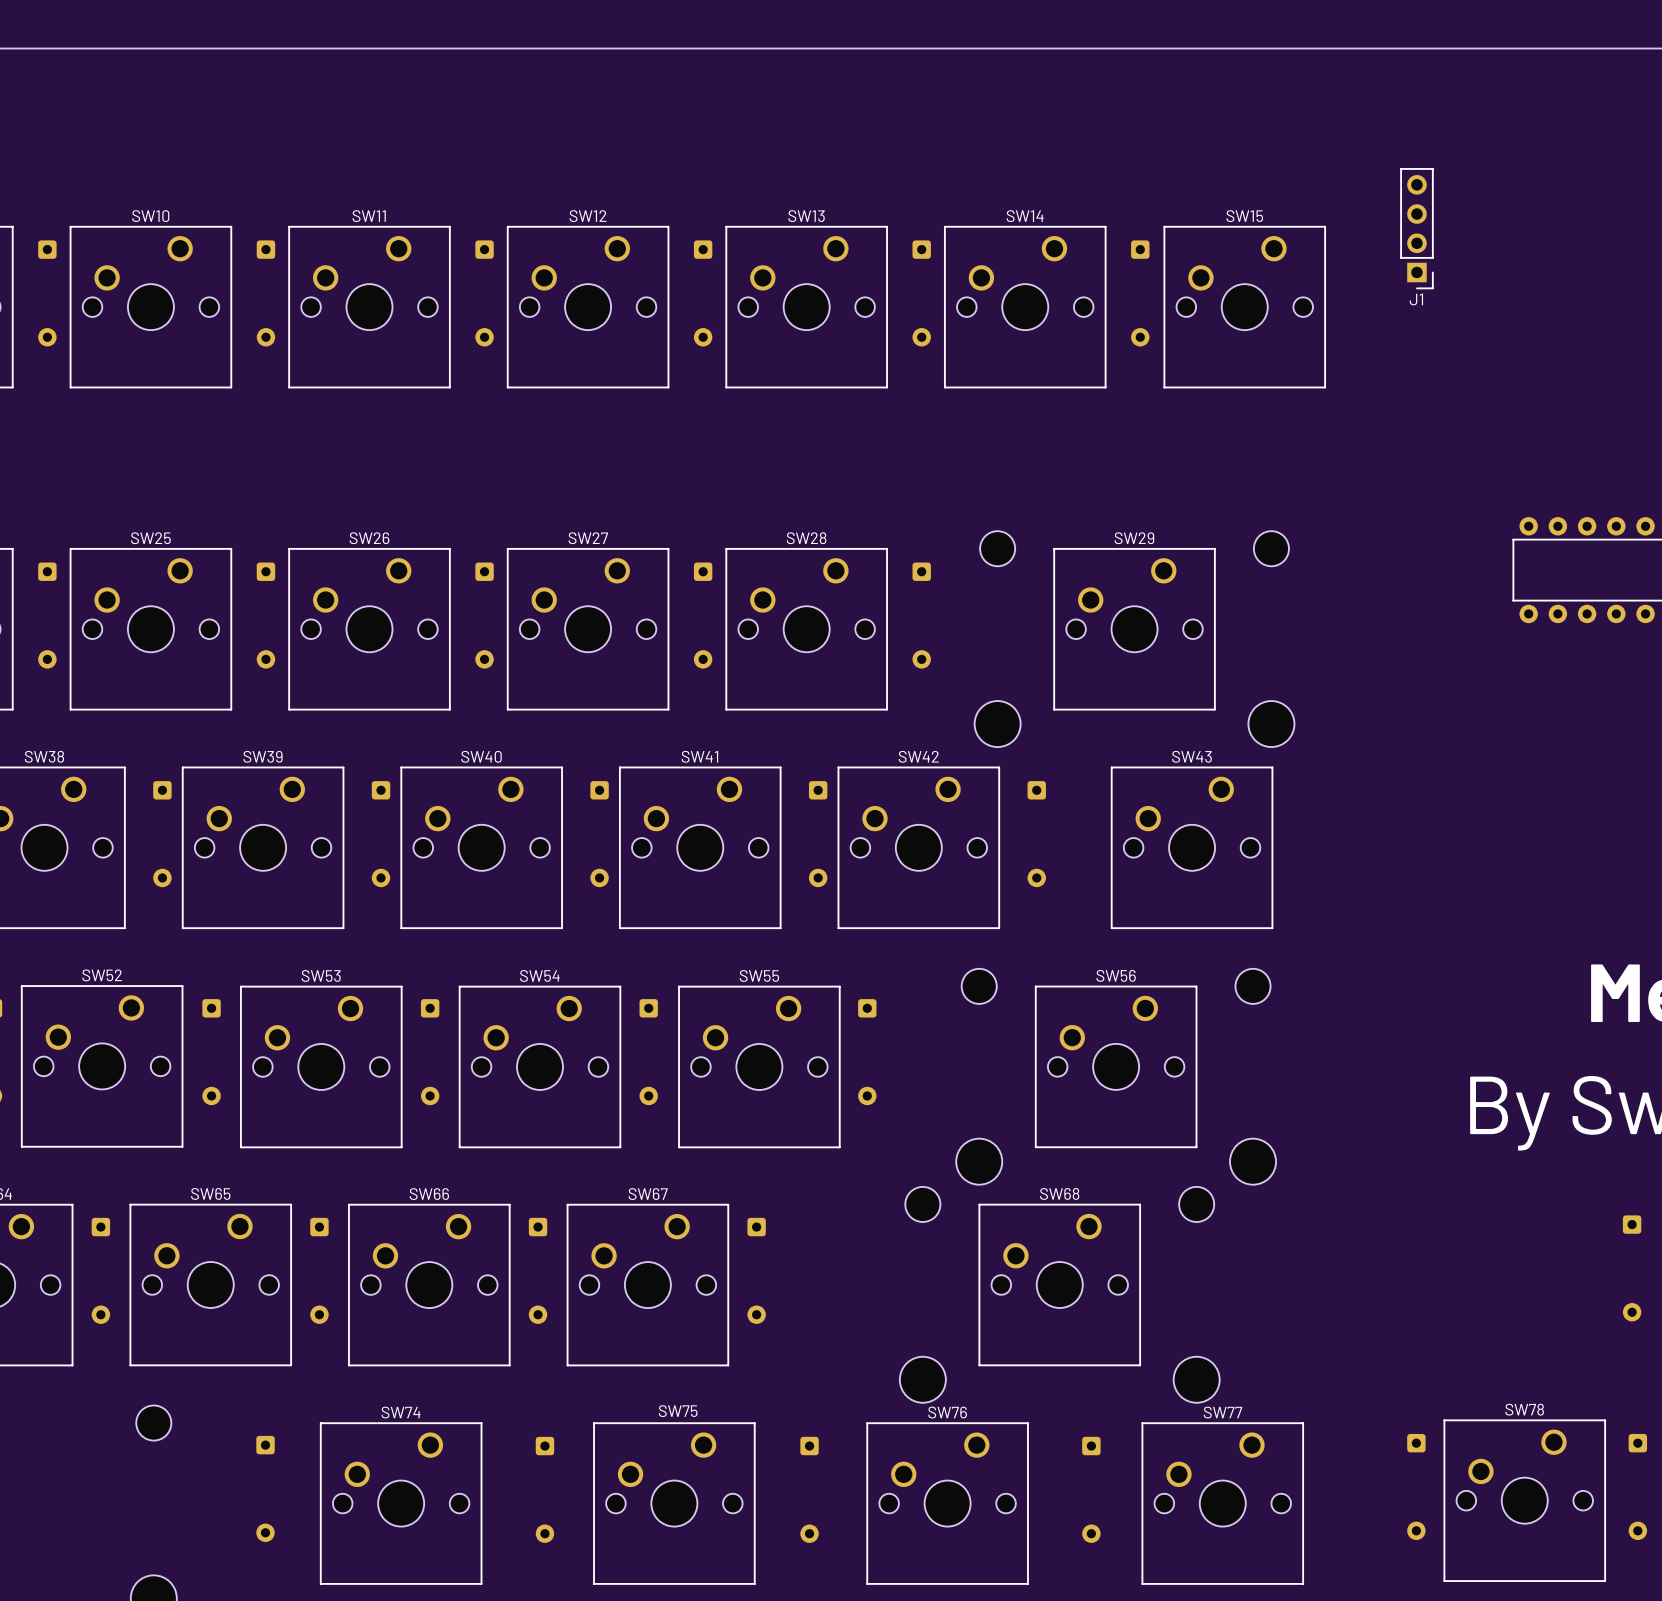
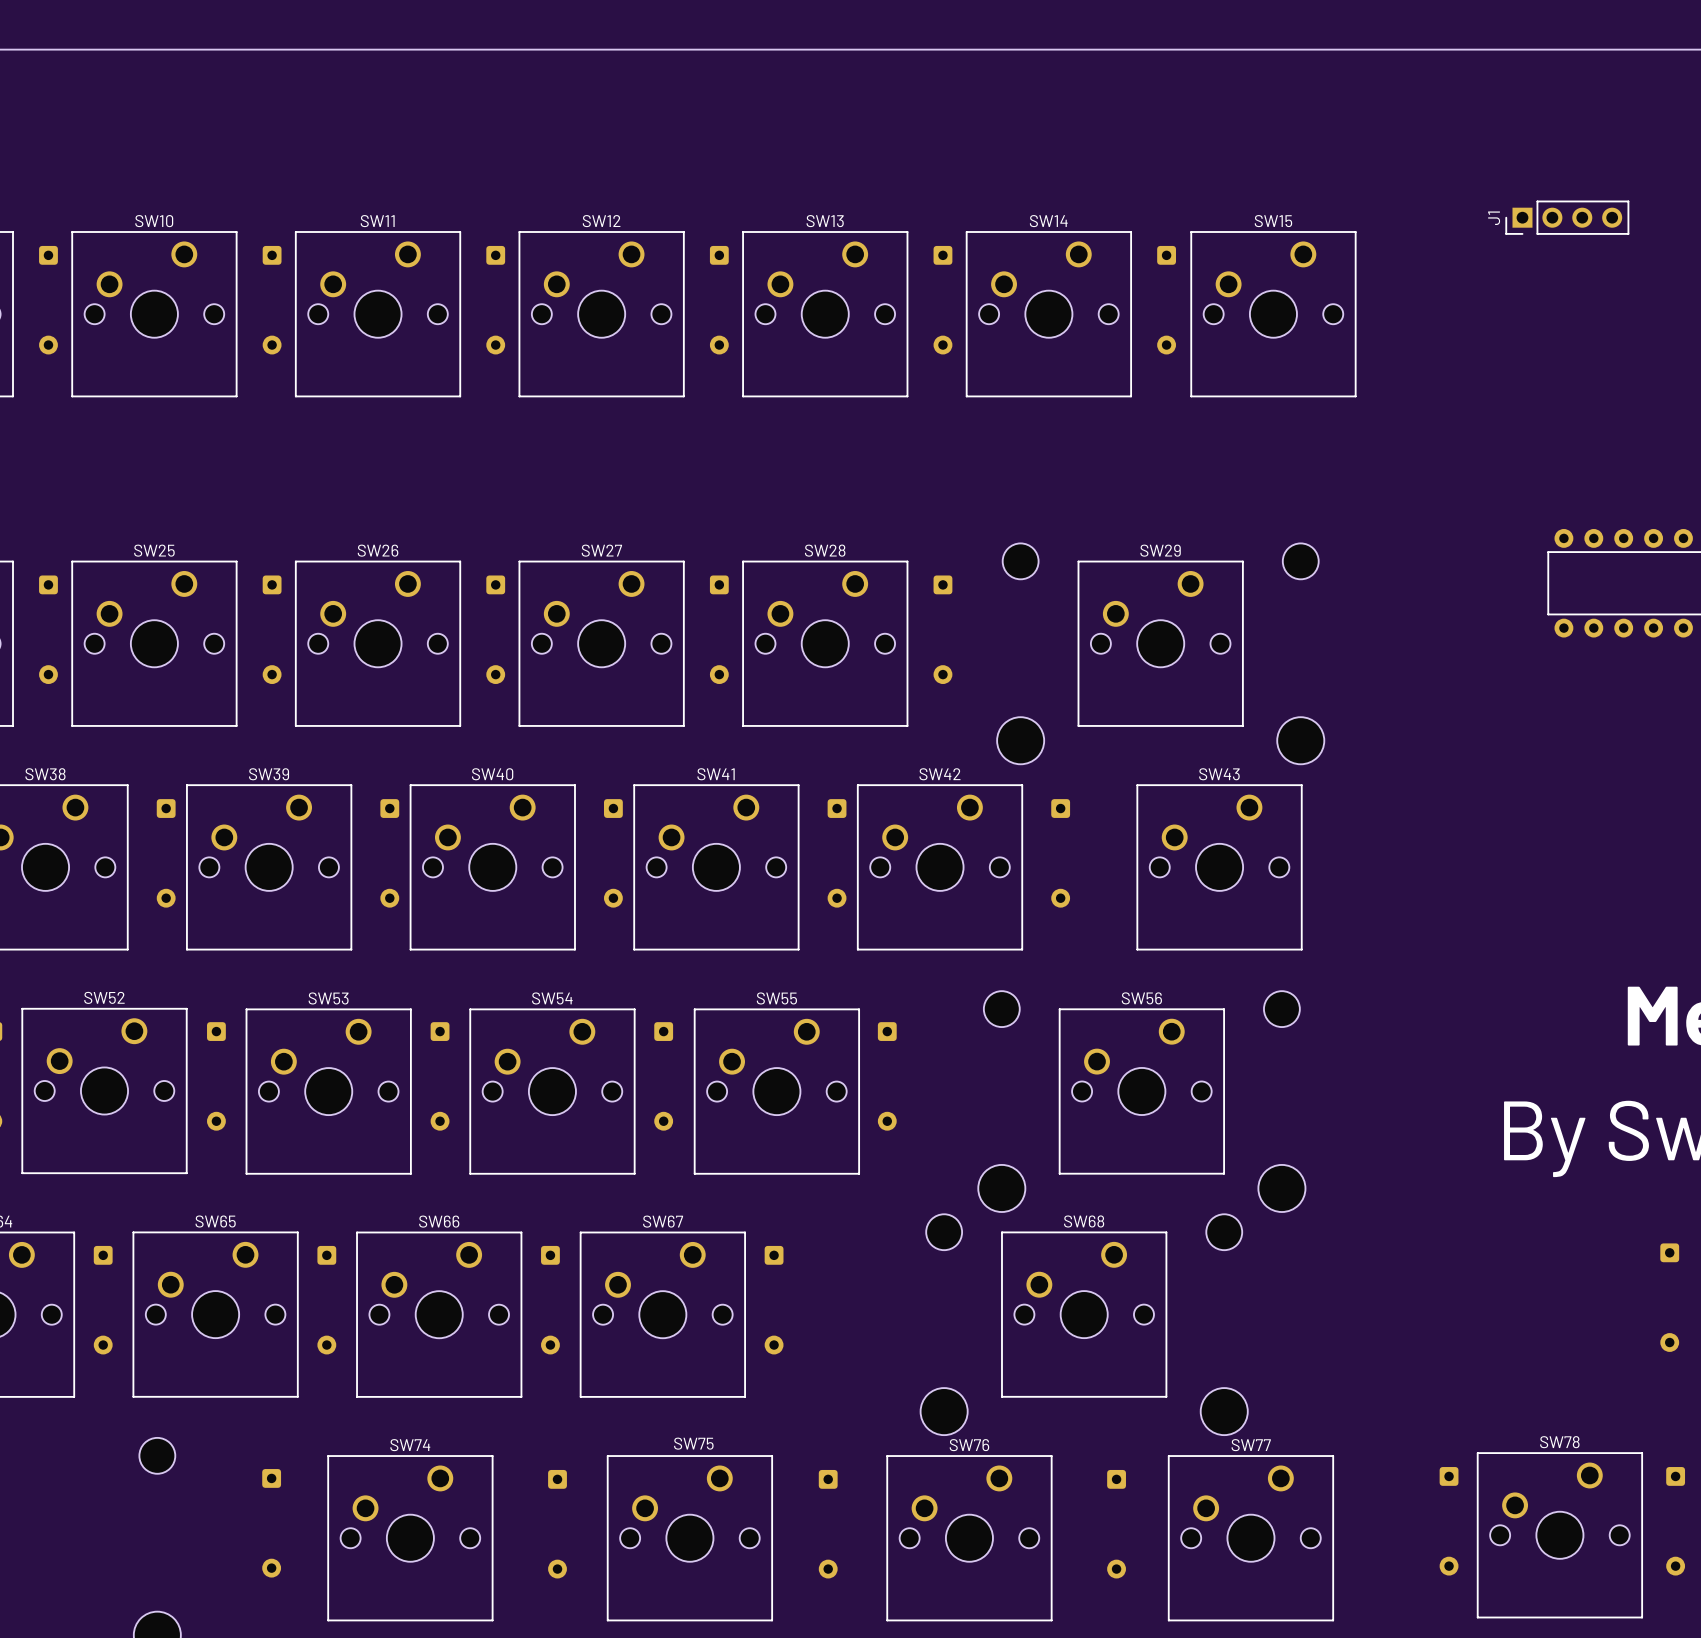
J1 rotation: 0° (1416, 228) -> 90° clockwise (1567, 217)
J1 position: (1416, 228) -> (1567, 217)

